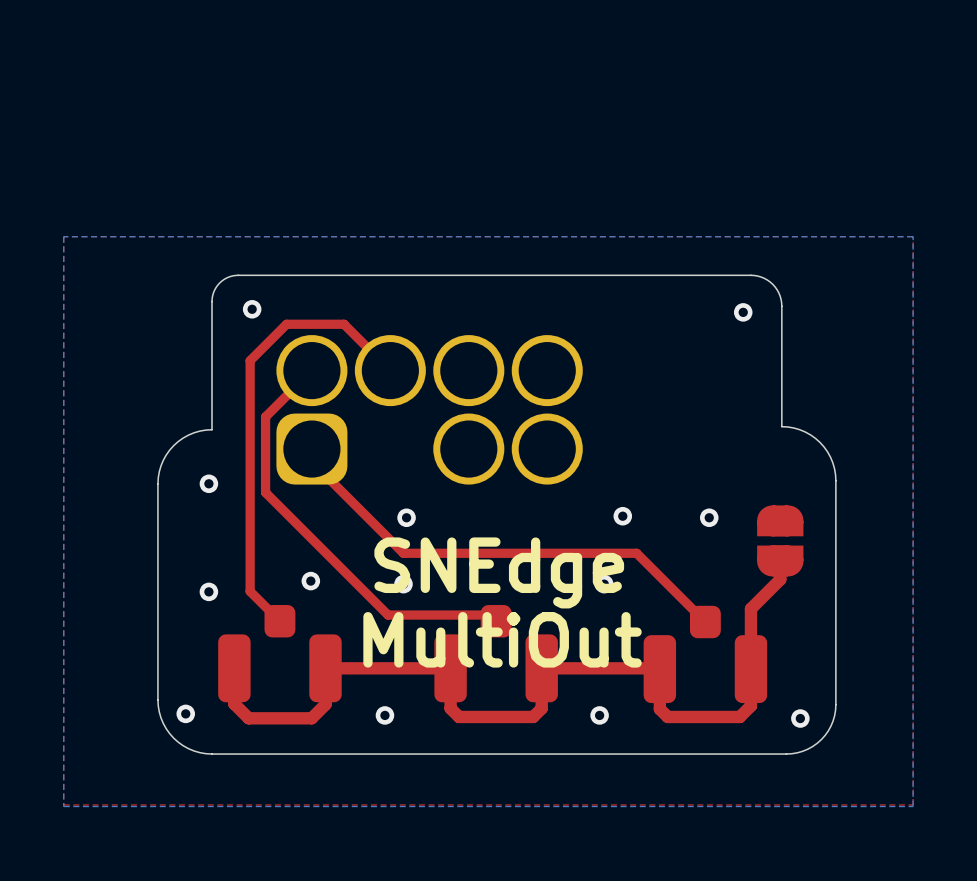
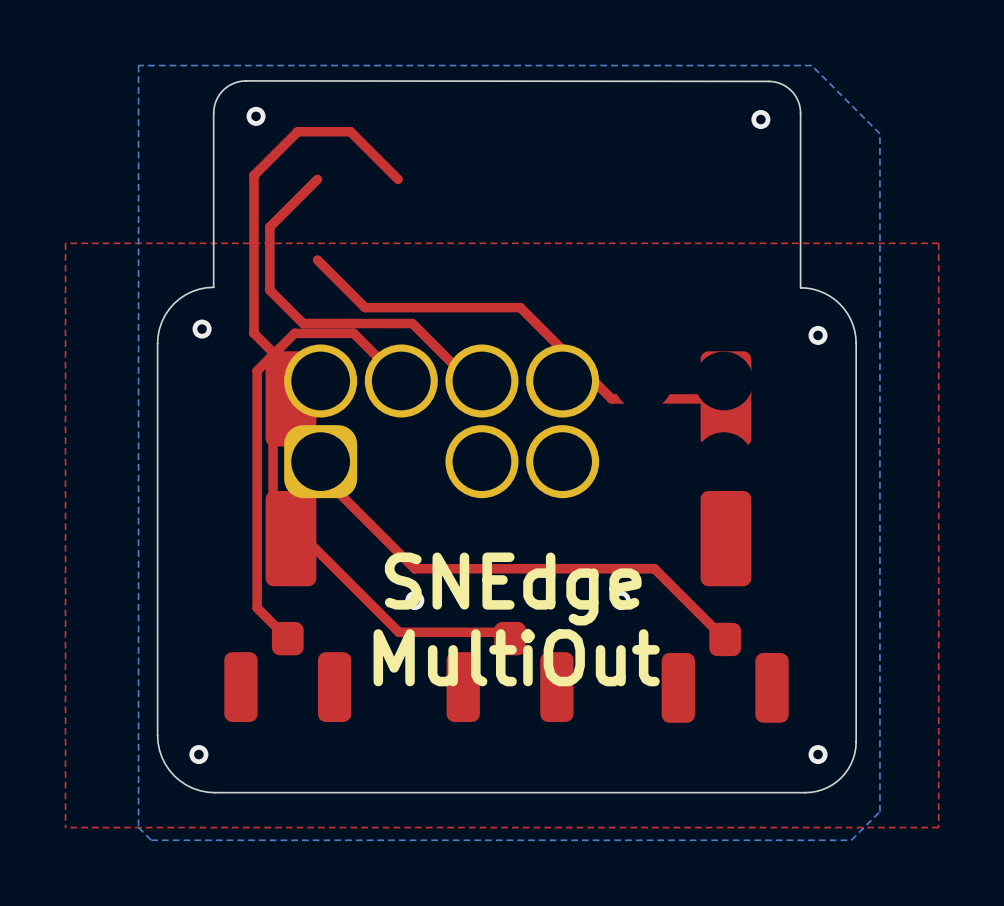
via: none -> (256, 116)
via: none -> (760, 119)
top track: none -> (317, 179) (269, 226) (269, 290) (303, 323) (412, 323) (487, 398) (508, 398)
top track: none -> (398, 179) (350, 131) (297, 131) (253, 175) (253, 333) (290, 370) (290, 398)
bottom zone outline: (913, 236) (63, 236) (63, 806) (913, 806) (913, 236) -> (811, 65) (879, 133) (879, 811) (851, 840) (151, 840) (138, 827) (138, 65) (811, 65)
top track: none -> (317, 260) (365, 307) (520, 307) (611, 398) (725, 398)
board edge: (750, 275) (238, 275) (221, 281) (214, 290) (212, 298) (212, 429) (194, 432) (178, 441) (166, 455) (158, 477) (157, 699) (160, 717) (169, 733) (188, 748) (212, 754) (786, 754) (802, 751) (817, 743) (828, 730) (835, 710) (835, 474) (827, 451) (815, 438) (799, 429) (781, 426) (781, 299) (777, 289) (770, 282) (761, 277) (750, 275) -> (245, 80) (768, 81) (782, 84) (793, 93) (798, 102) (800, 113) (800, 287) (818, 290) (835, 299) (850, 319) (855, 337) (856, 741) (851, 763) (837, 781) (822, 789) (805, 792) (214, 792) (199, 790) (186, 784) (169, 770) (161, 757) (157, 735) (158, 336) (165, 315) (179, 298) (199, 289) (213, 287) (213, 108) (216, 100) (223, 90) (233, 83) (245, 80)
via position: (252, 309) -> (202, 329)
via position: (743, 312) -> (818, 335)
part: none -> (290, 468)
part: none -> (725, 468)
via: (208, 483) -> none
via: (622, 516) -> none
via: (406, 517) -> none
via: (709, 517) -> none
part: (780, 540) -> none
top track: (780, 561) (780, 579) (750, 608) (750, 705) (739, 716) (667, 716) (659, 709) (659, 669) (541, 668) (541, 708) (533, 716) (459, 716) (450, 708) (450, 668) (325, 668) (325, 704) (311, 718) (248, 718) (234, 703) (234, 668) -> none
via: (310, 581) -> none
via: (208, 591) -> none
via position: (185, 713) -> (198, 754)
via: (384, 715) -> none
via: (599, 715) -> none
via position: (800, 718) -> (818, 754)

